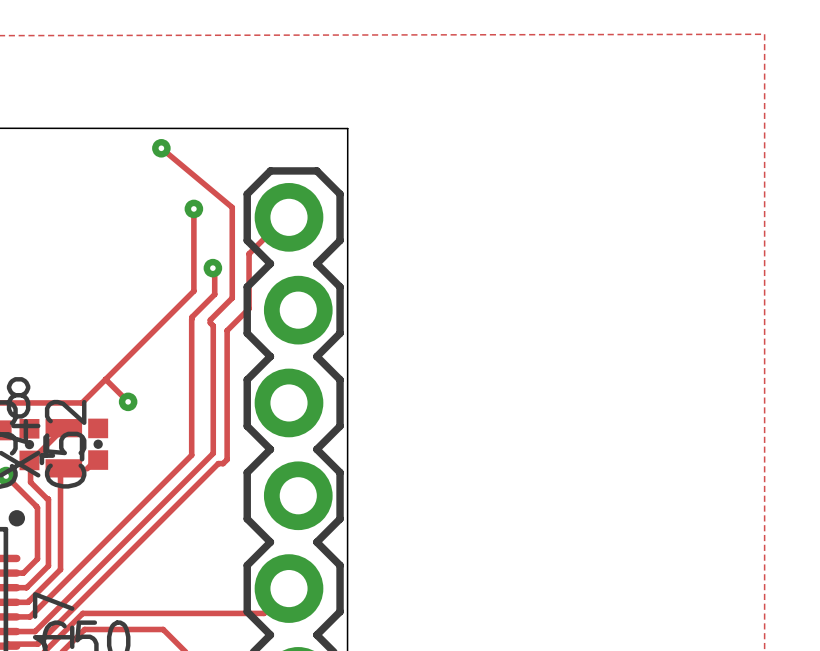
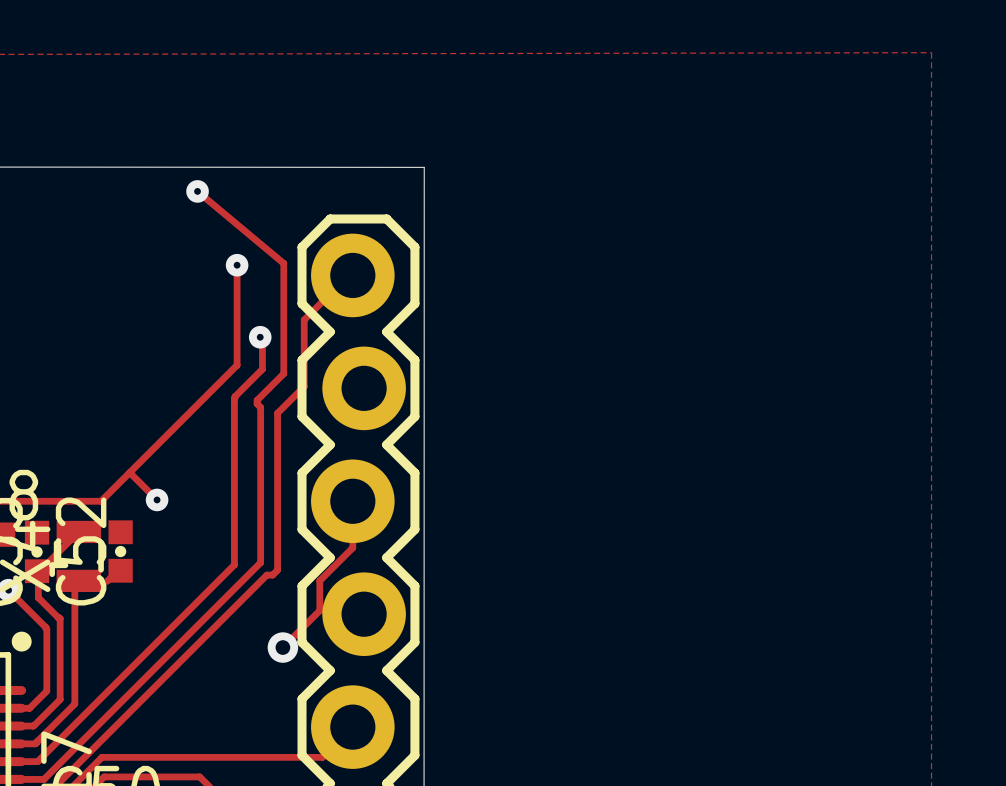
track: none -> (352, 501) (352, 547) (319, 580) (319, 610) (282, 647)
via: none -> (282, 647)

